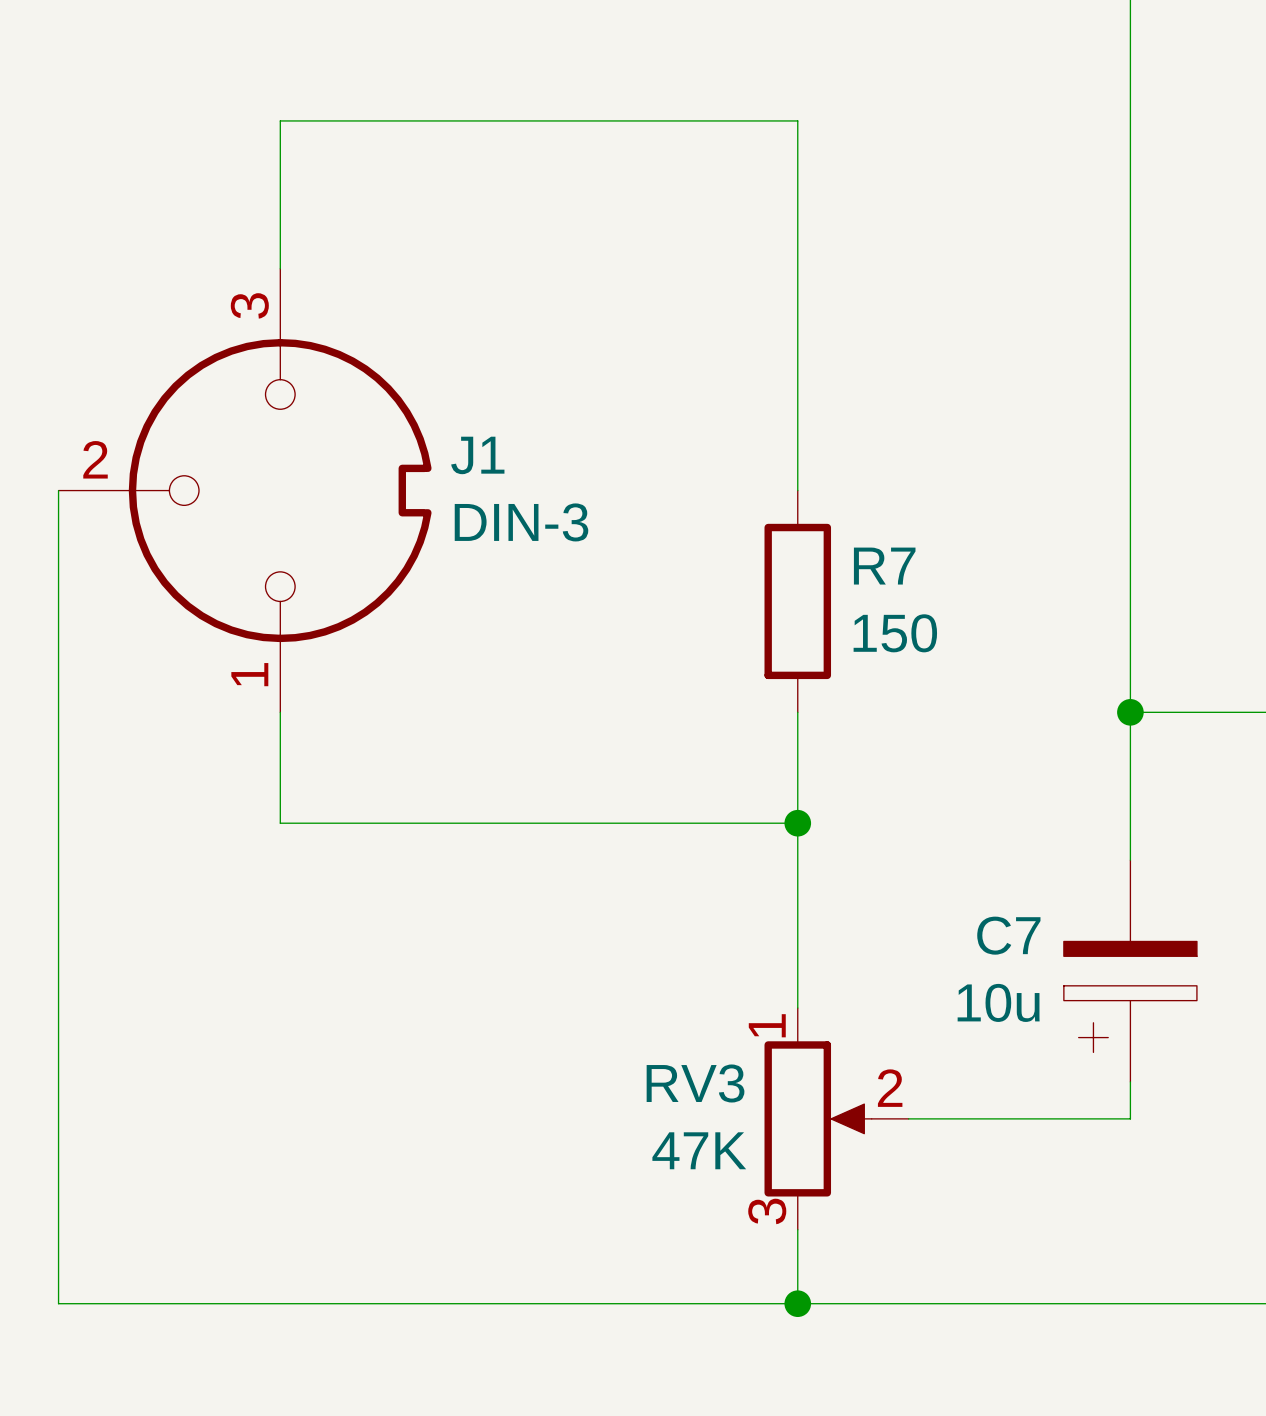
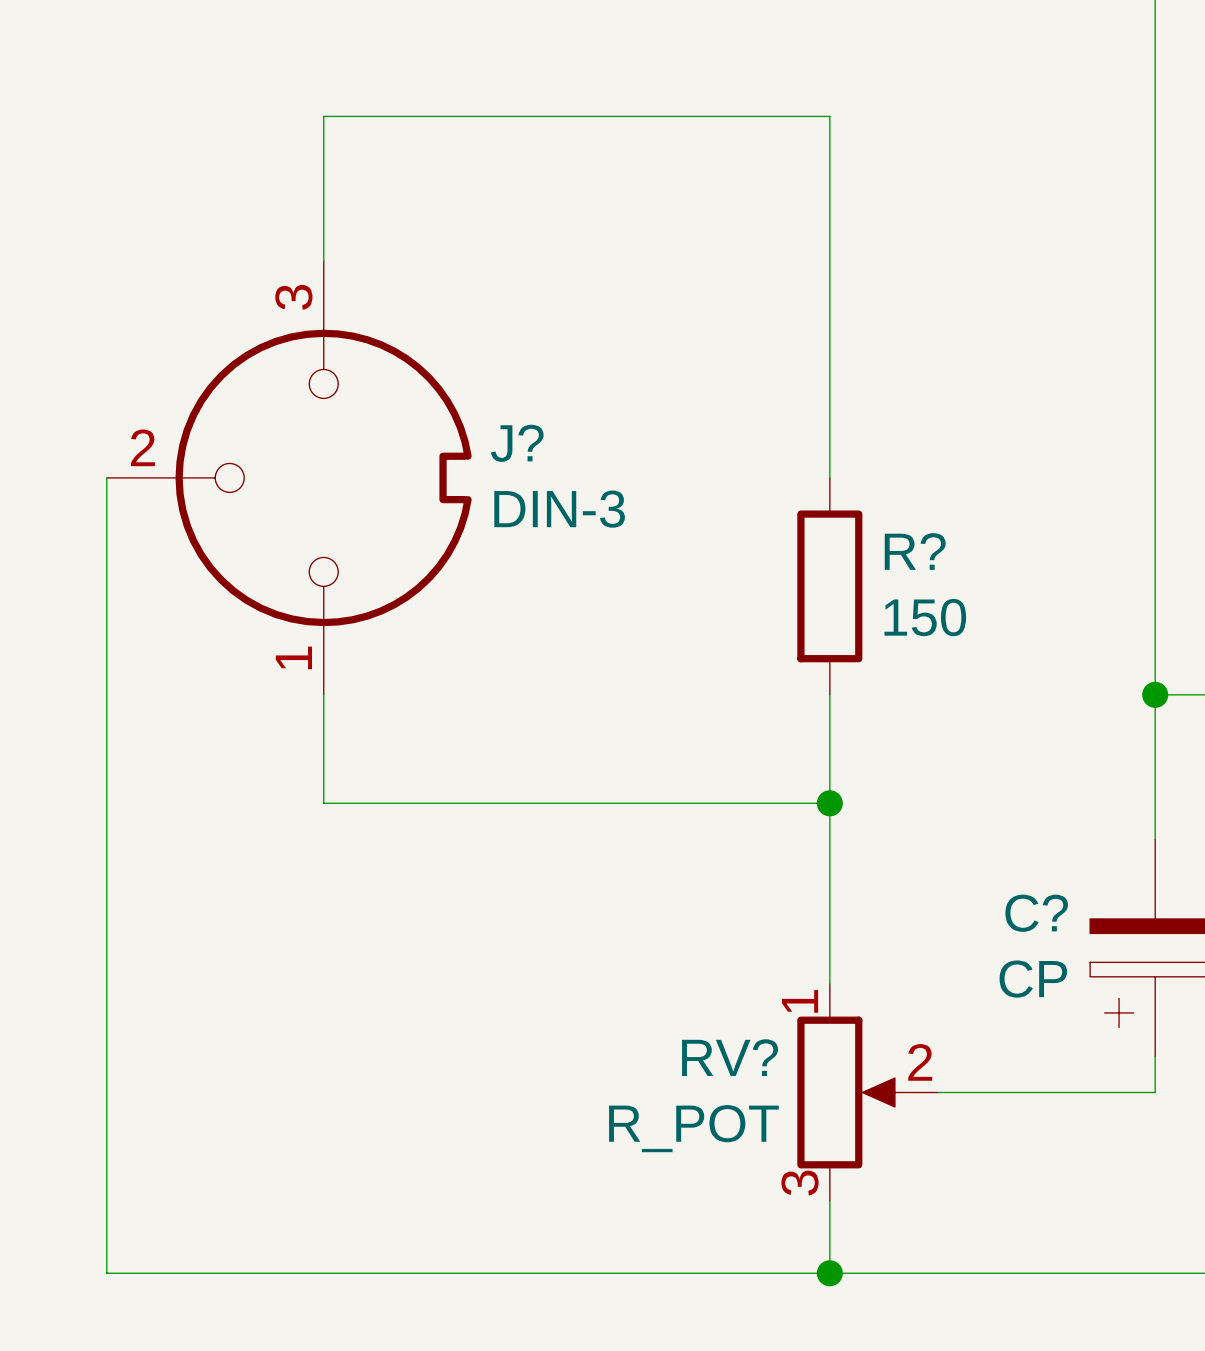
J1 name: J1 (477, 455) -> J? (517, 443)
R7 name: R7 (884, 566) -> R? (915, 551)
C7 name: C7 (1008, 935) -> C? (1036, 913)
C7 value: 10u (998, 1002) -> CP (1033, 979)
RV3 name: RV3 (695, 1083) -> RV? (730, 1057)
RV3 value: 47K (699, 1150) -> R_POT (693, 1128)

